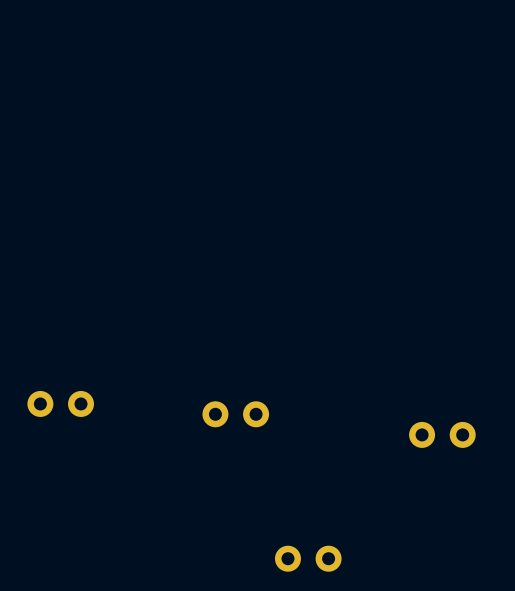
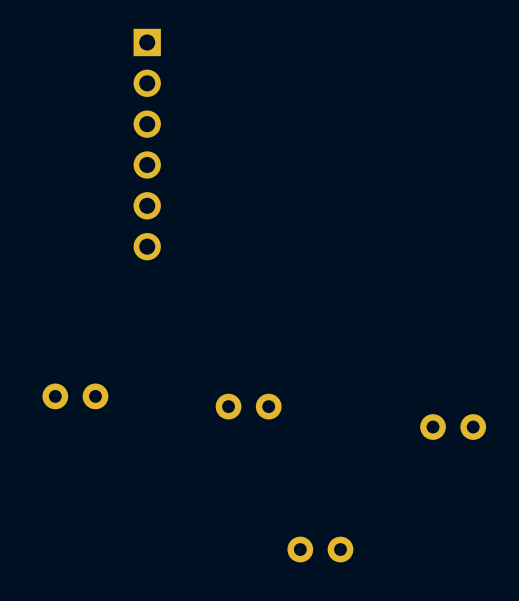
part: none -> (147, 144)

